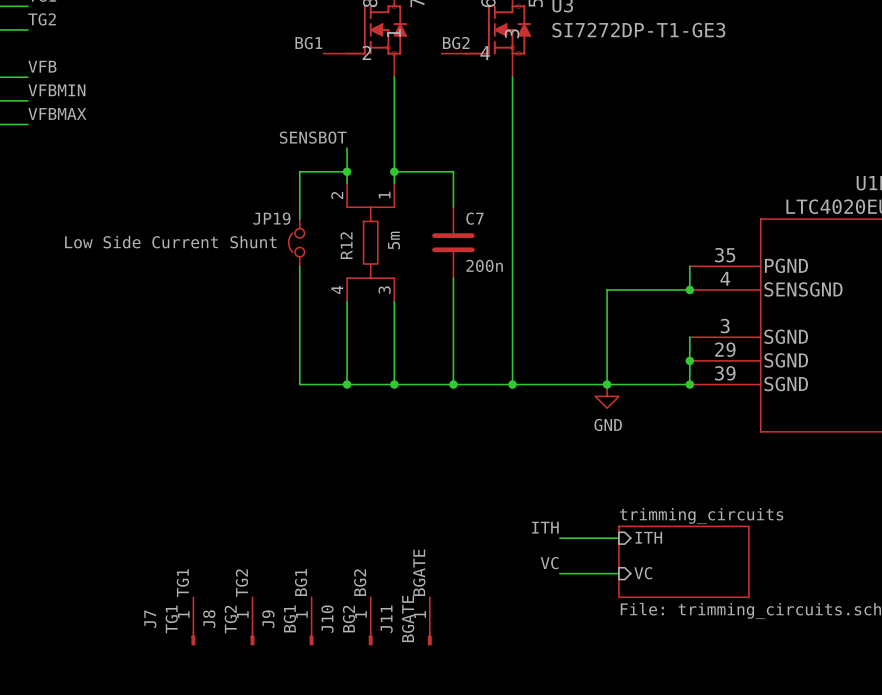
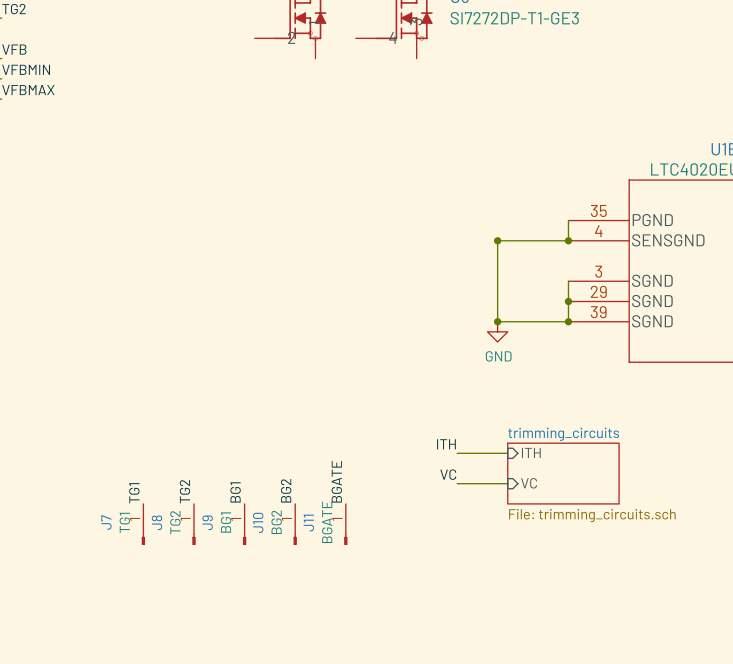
label: BG1 (308, 43) -> none
label: BG2 (456, 43) -> none
wire: (394, 77) (394, 183) -> none
wire: (512, 77) (512, 384) -> none
label: SENSBOT (313, 137) -> none
wire: (347, 148) (347, 183) -> none
wire: (347, 171) (299, 171) (299, 219) -> none
junction: (347, 171) -> none
wire: (394, 171) (453, 171) (453, 207) -> none
junction: (394, 171) -> none
JP19: Low Side Current Shunt (296, 242) -> none
R12: 5m (370, 242) -> none
C7: 200n (453, 242) -> none
wire: (299, 266) (299, 384) (607, 384) -> none
wire: (453, 278) (453, 384) -> none
junction: none -> (497, 240)
wire: (347, 301) (347, 384) -> none
wire: (394, 301) (394, 384) -> none
junction: (347, 384) -> none
junction: (394, 384) -> none
junction: (453, 384) -> none
junction: (512, 384) -> none

